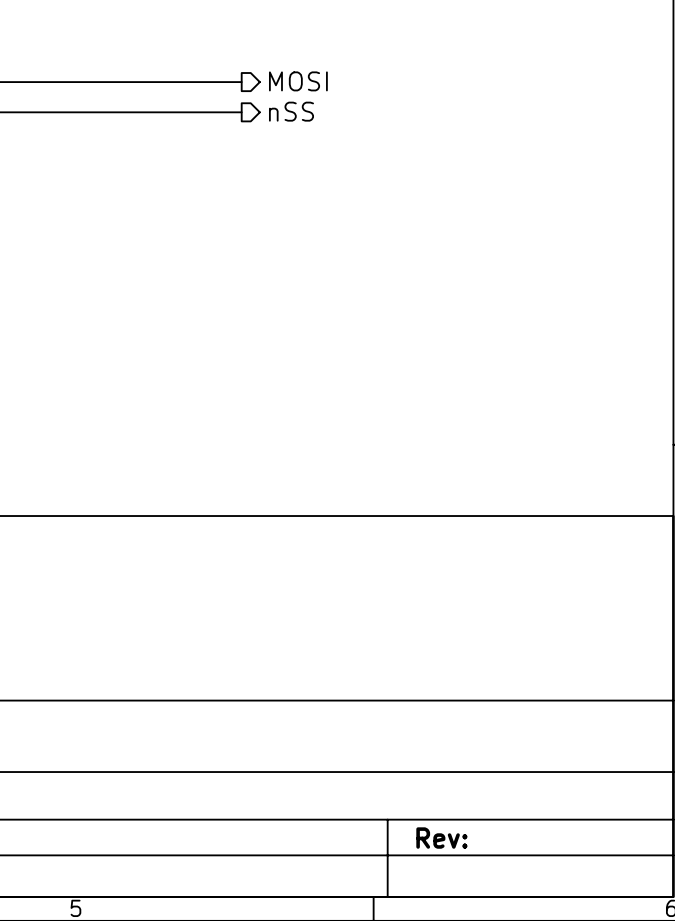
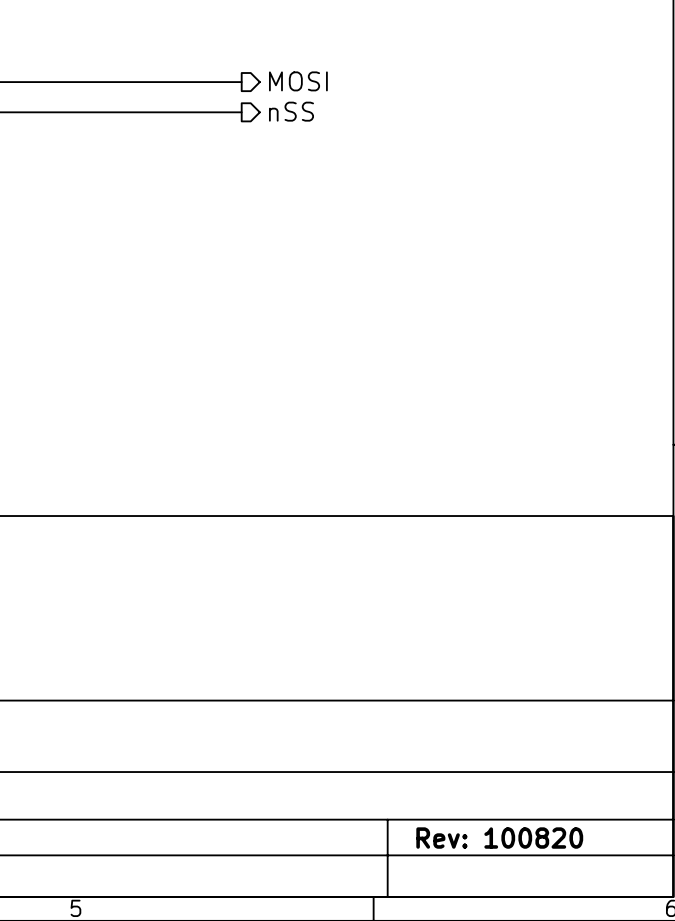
title block: Rev: (441, 838) -> Rev: 100820 (499, 838)

